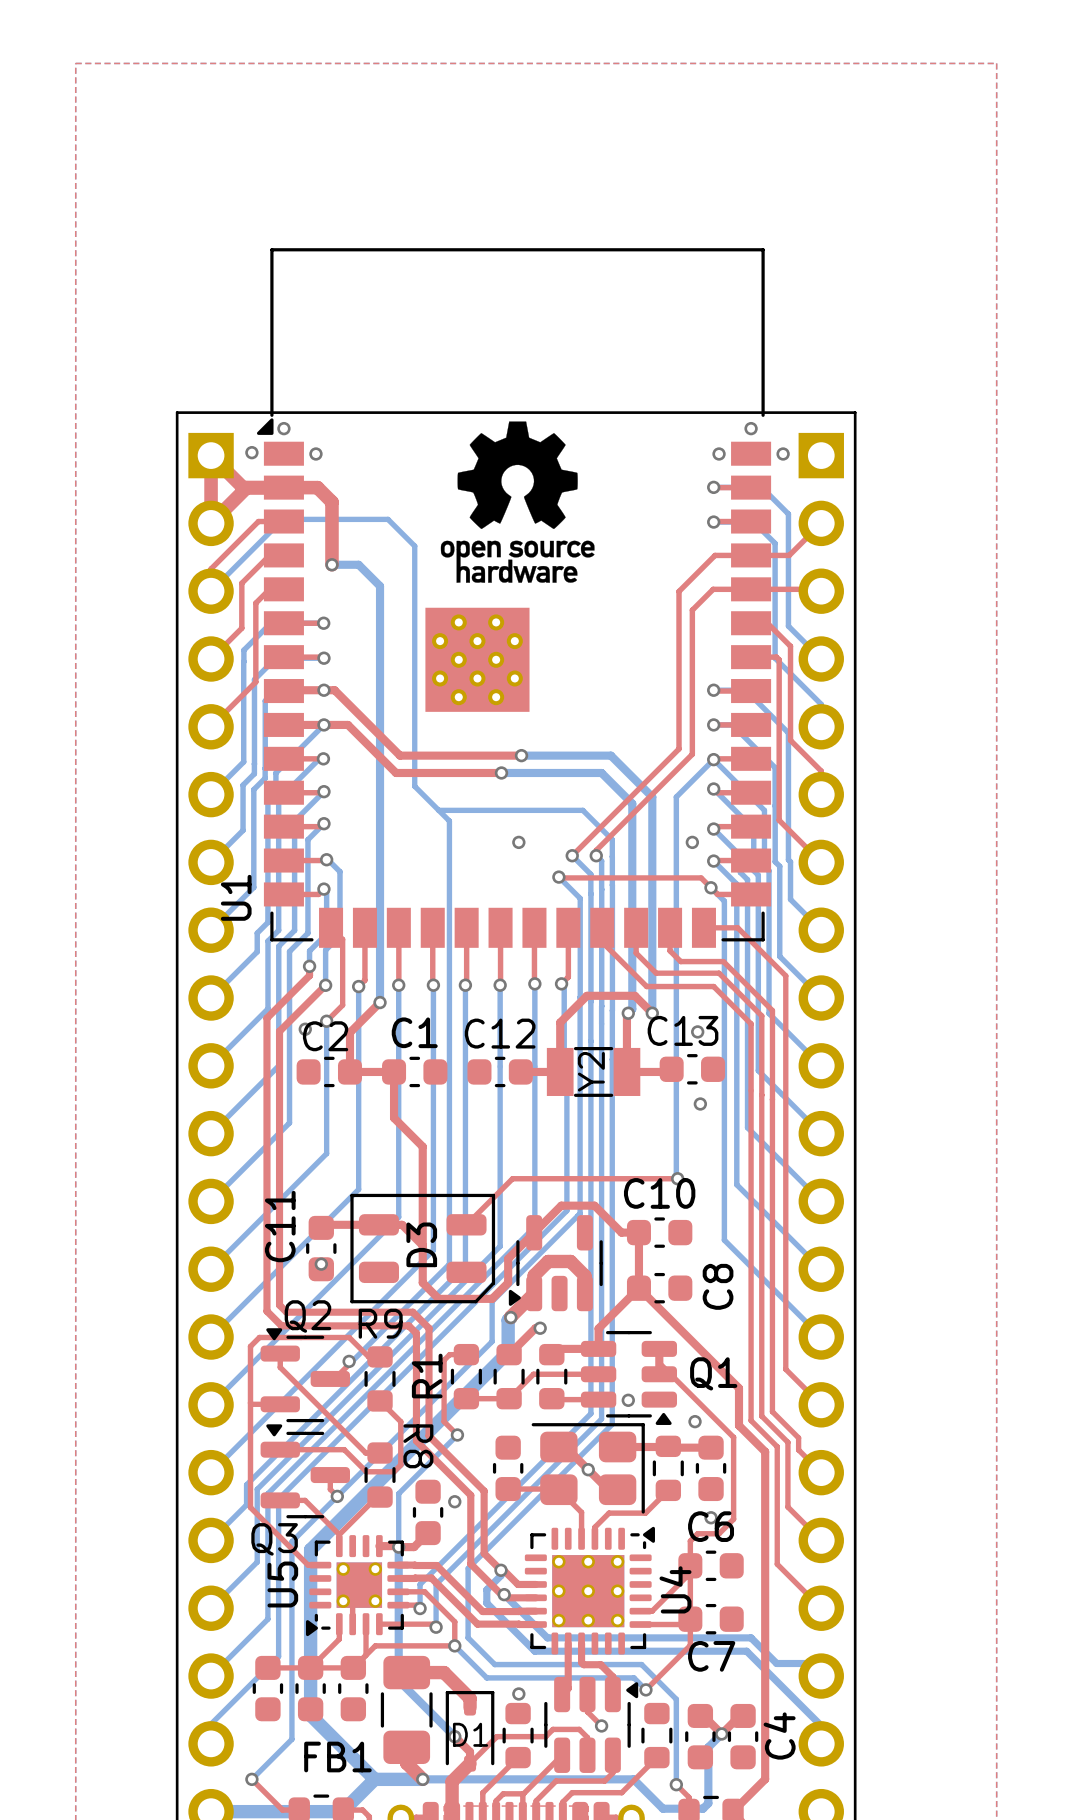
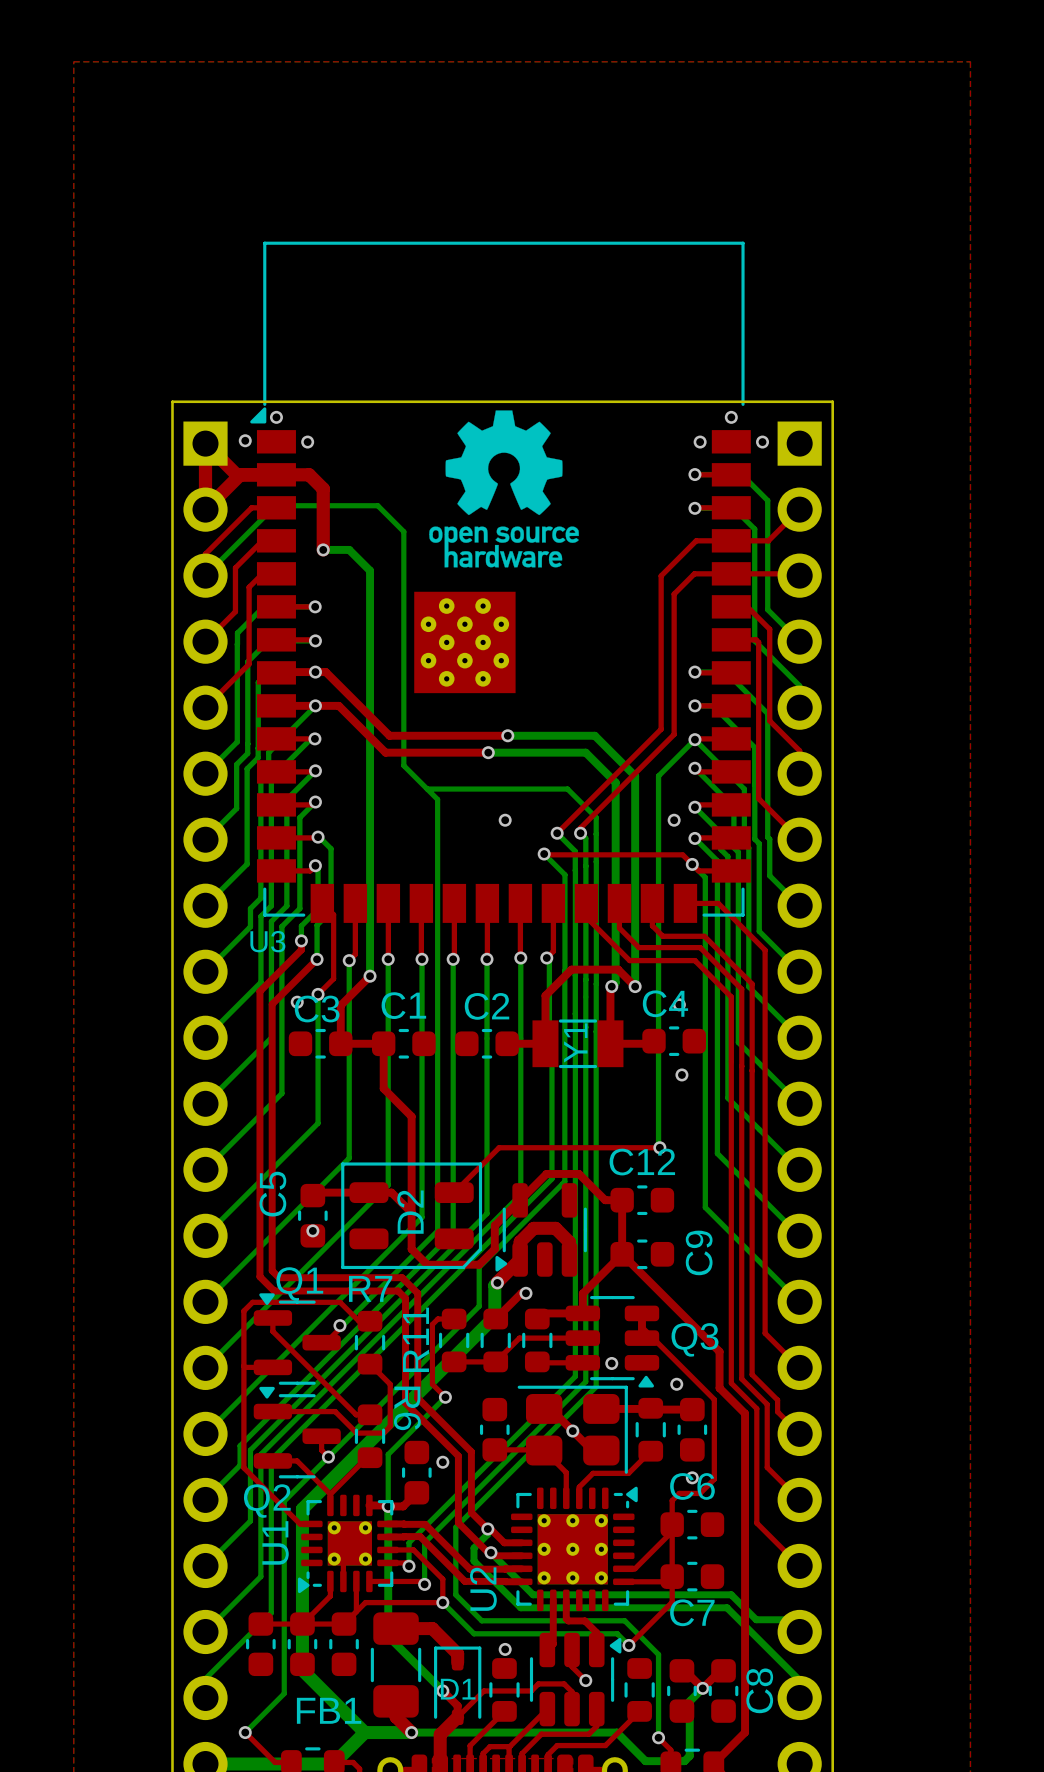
U1 footprint: [256, 248, 772, 948] -> [297, 1494, 399, 1594]
U3: none -> (500, 582)
U1 name position: U1 (236, 897) -> U1 (275, 1542)
C13 name: C13 (683, 1030) -> C4 (665, 1003)
C12 name: C12 (500, 1033) -> C2 (487, 1006)
C2 name: C2 (325, 1036) -> C3 (317, 1009)
Y2 name: Y2 (591, 1071) -> Y1 (575, 1042)
C10 name: C10 (659, 1193) -> C12 (642, 1162)
C11 name: C11 (280, 1226) -> C5 (272, 1194)
D3 name: D3 (421, 1244) -> D2 (410, 1212)
C8 name: C8 (718, 1286) -> C9 (699, 1252)
Q2 name: Q2 (307, 1316) -> Q1 (299, 1284)
R9 name: R9 (380, 1323) -> R7 (370, 1288)
Q1 name: Q1 (713, 1373) -> Q3 (695, 1339)
R1 name: R1 (427, 1376) -> R11 (415, 1339)
R8 name: R8 (418, 1446) -> R6 (407, 1408)
Q3 name: Q3 (274, 1539) -> Q2 (267, 1501)
U5: (357, 1585) -> none
U4: (589, 1590) -> none
U2: none -> (574, 1548)
C4 name: C4 (779, 1736) -> C8 (759, 1690)

